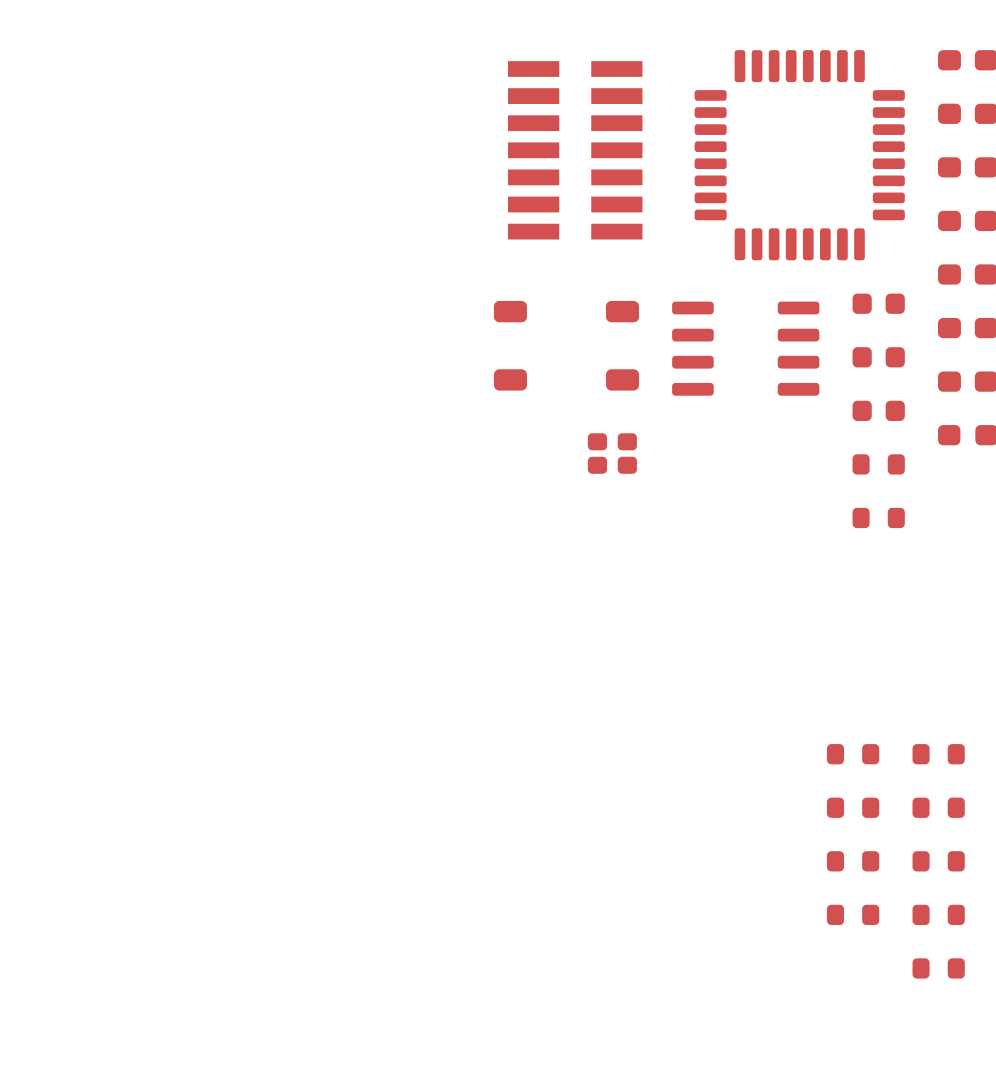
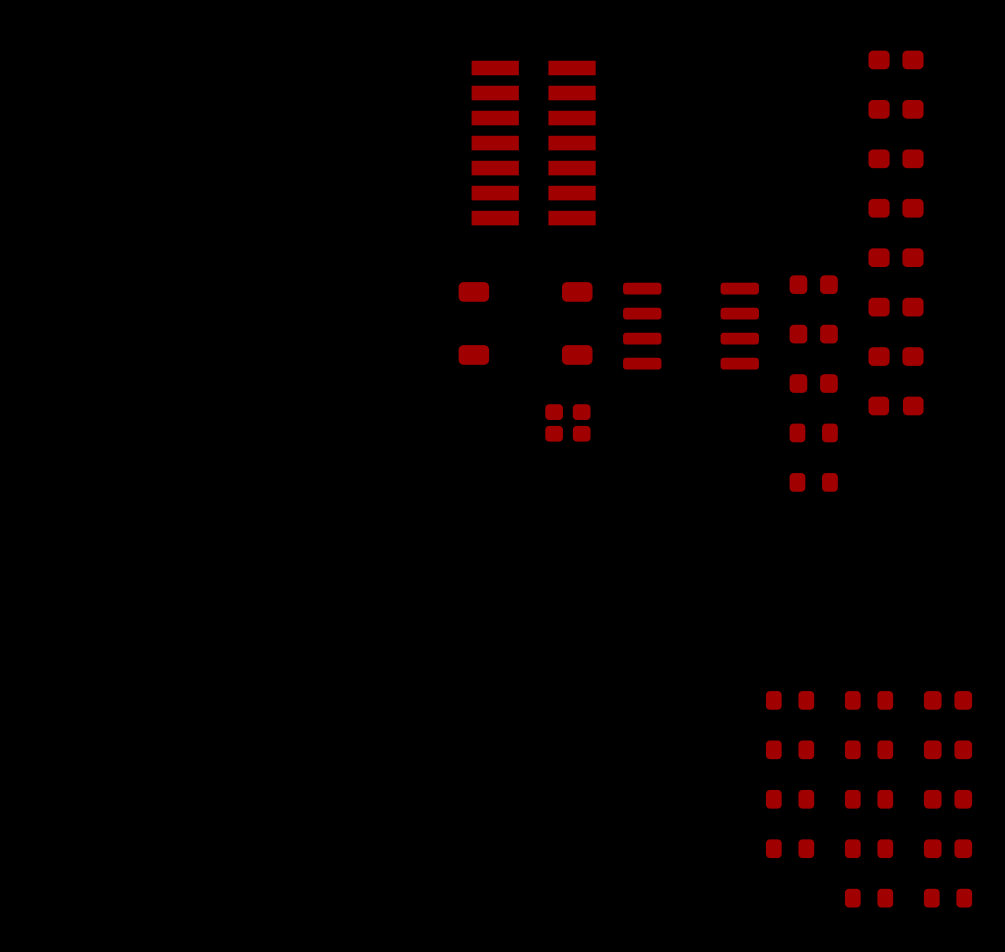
part: (799, 155) -> none

